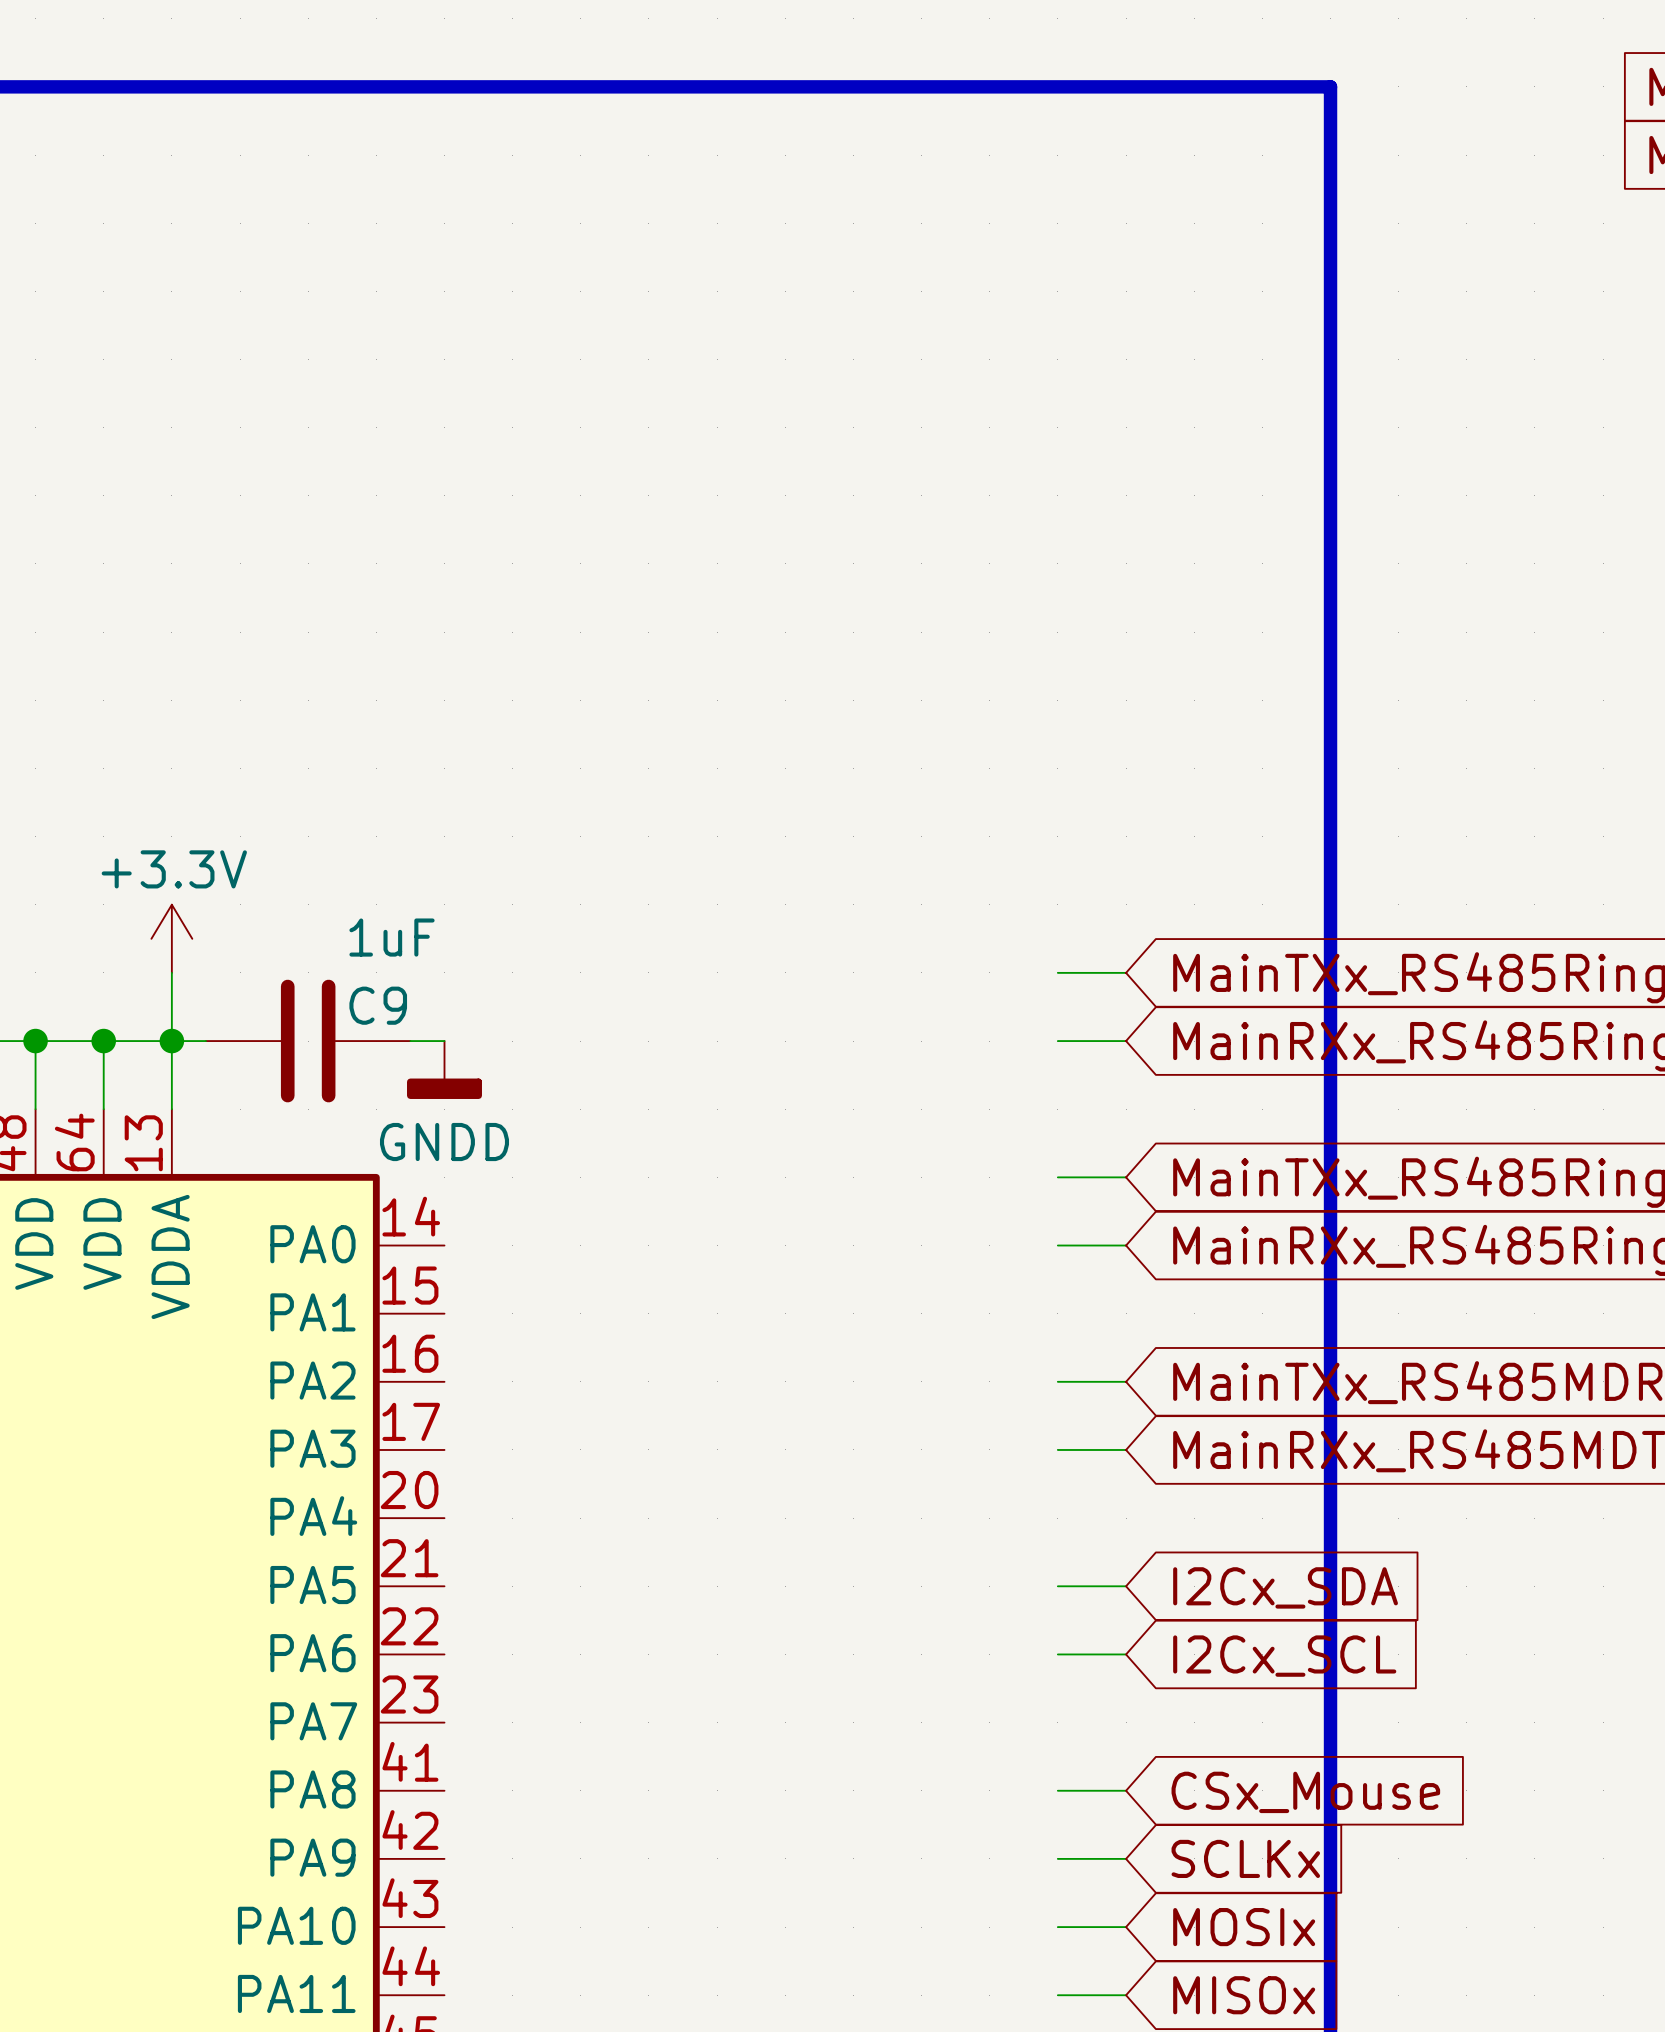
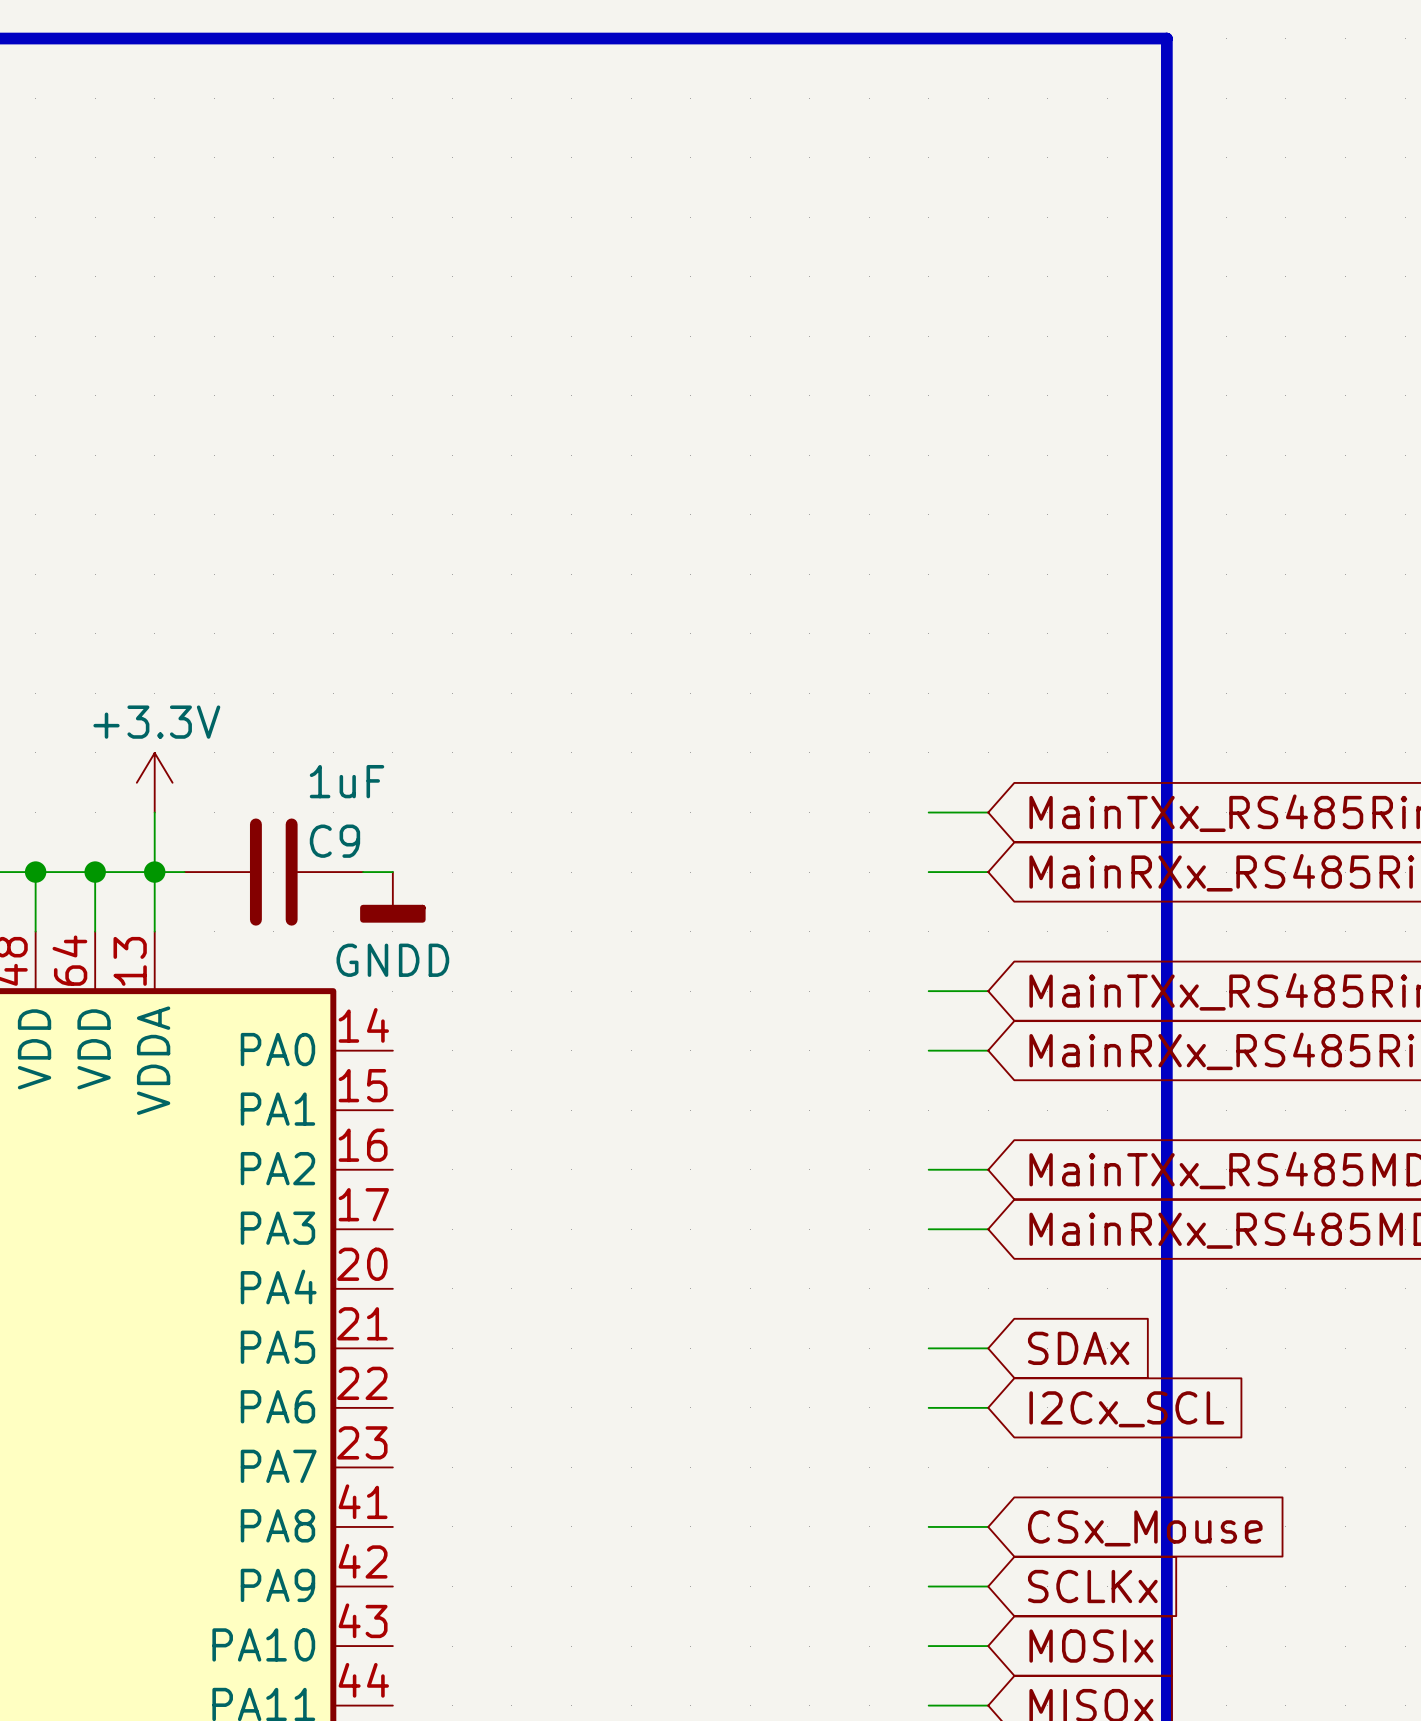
global label: I2Cx_SDA (1285, 1587) -> SDAx (1078, 1348)

